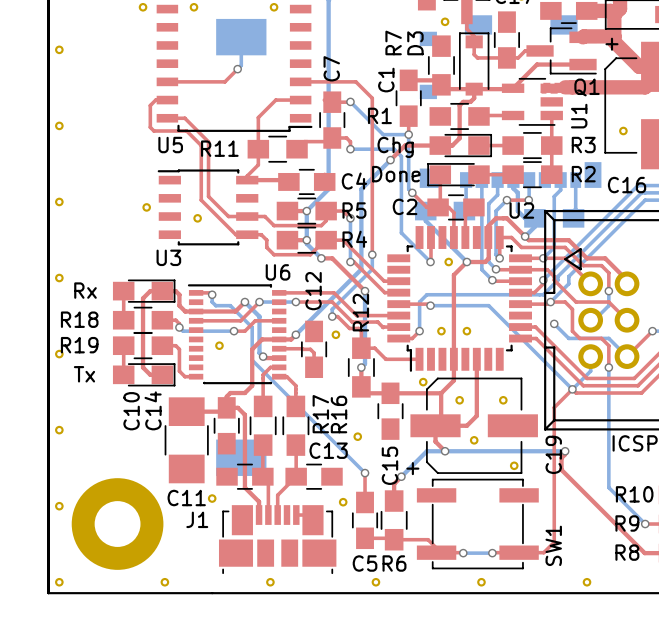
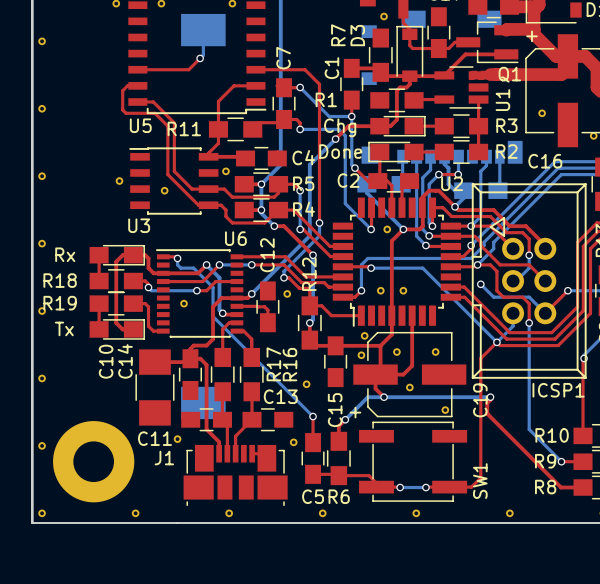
part: none -> (225, 171)
part: none -> (361, 355)

